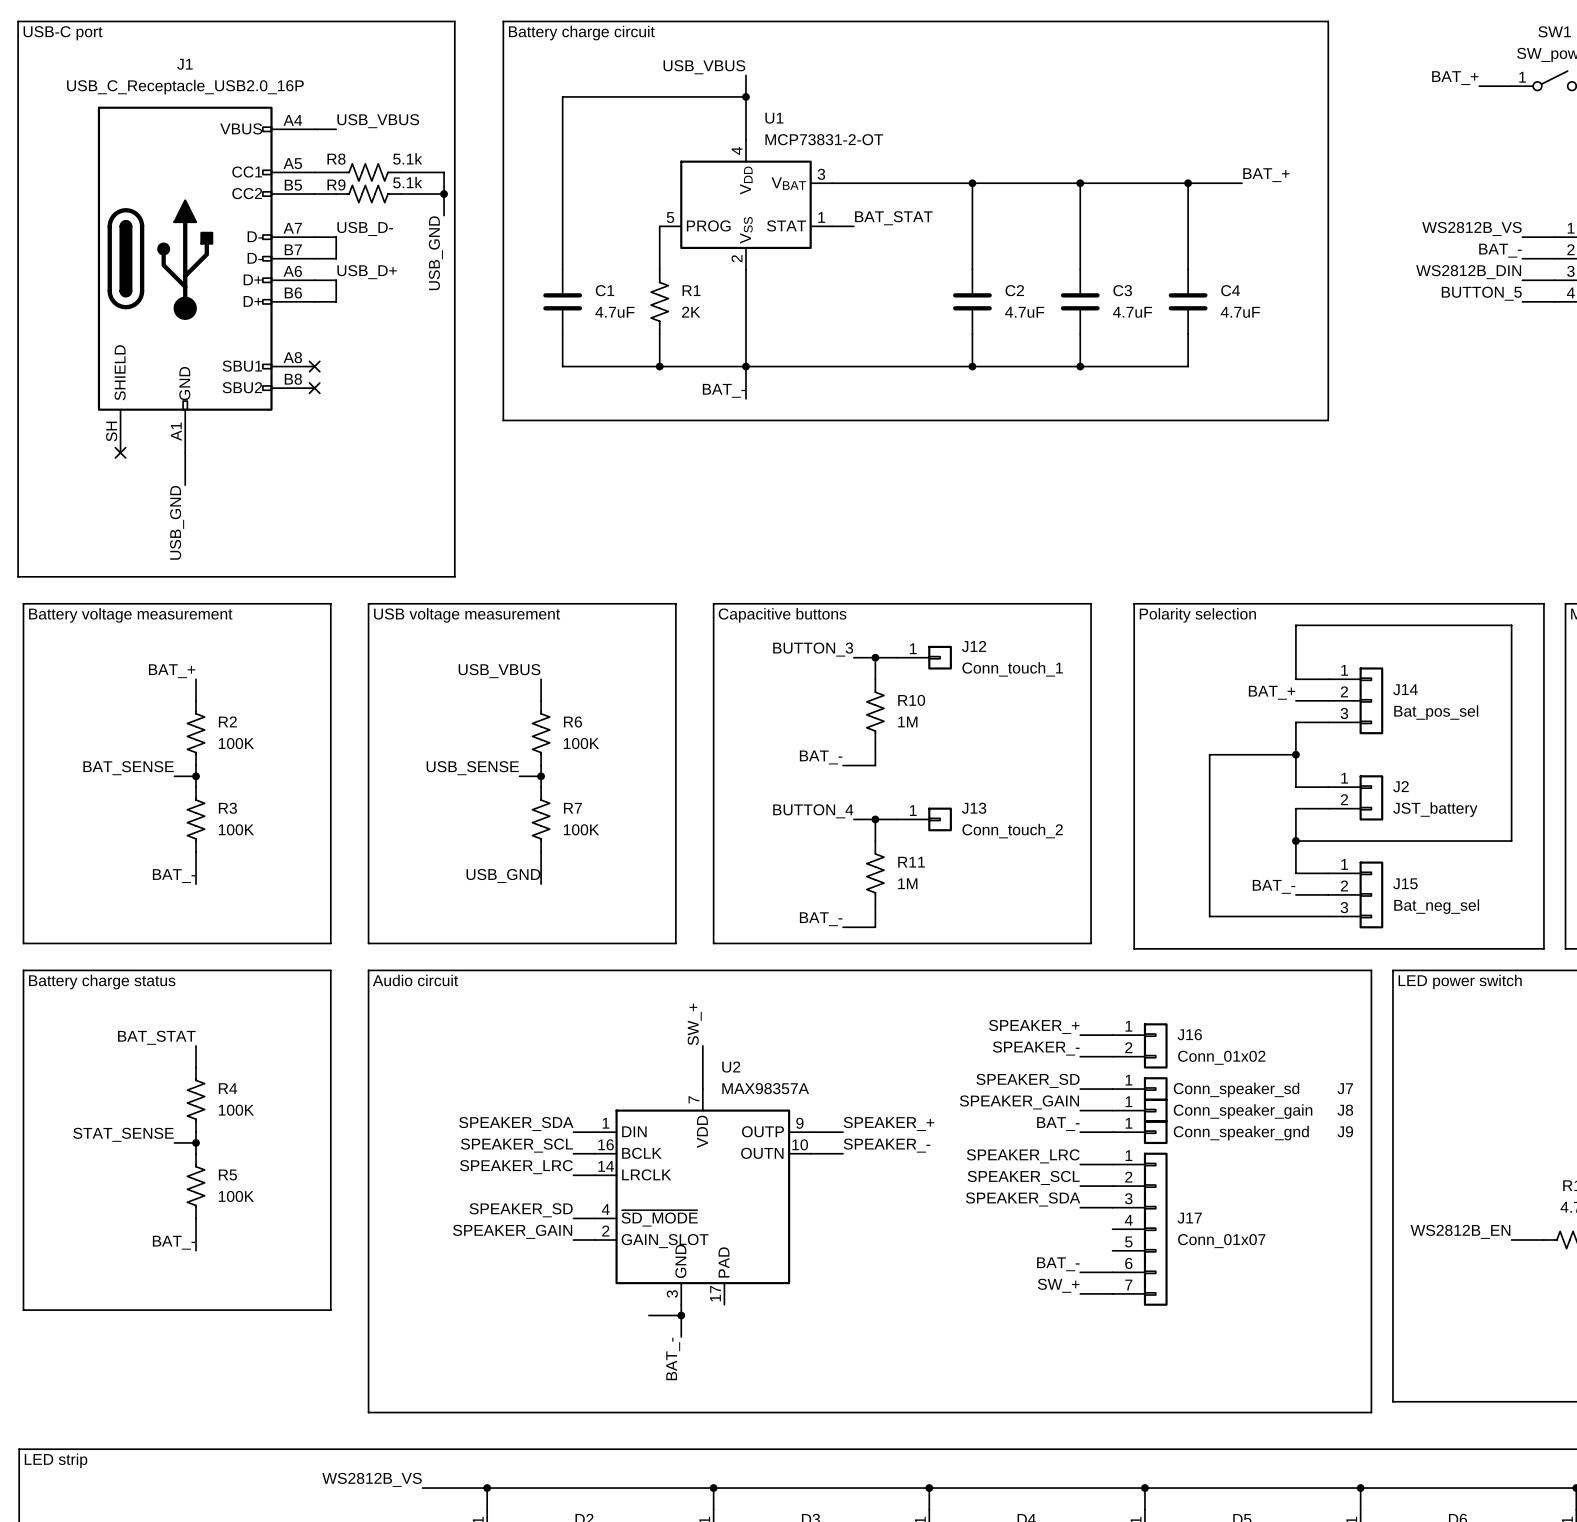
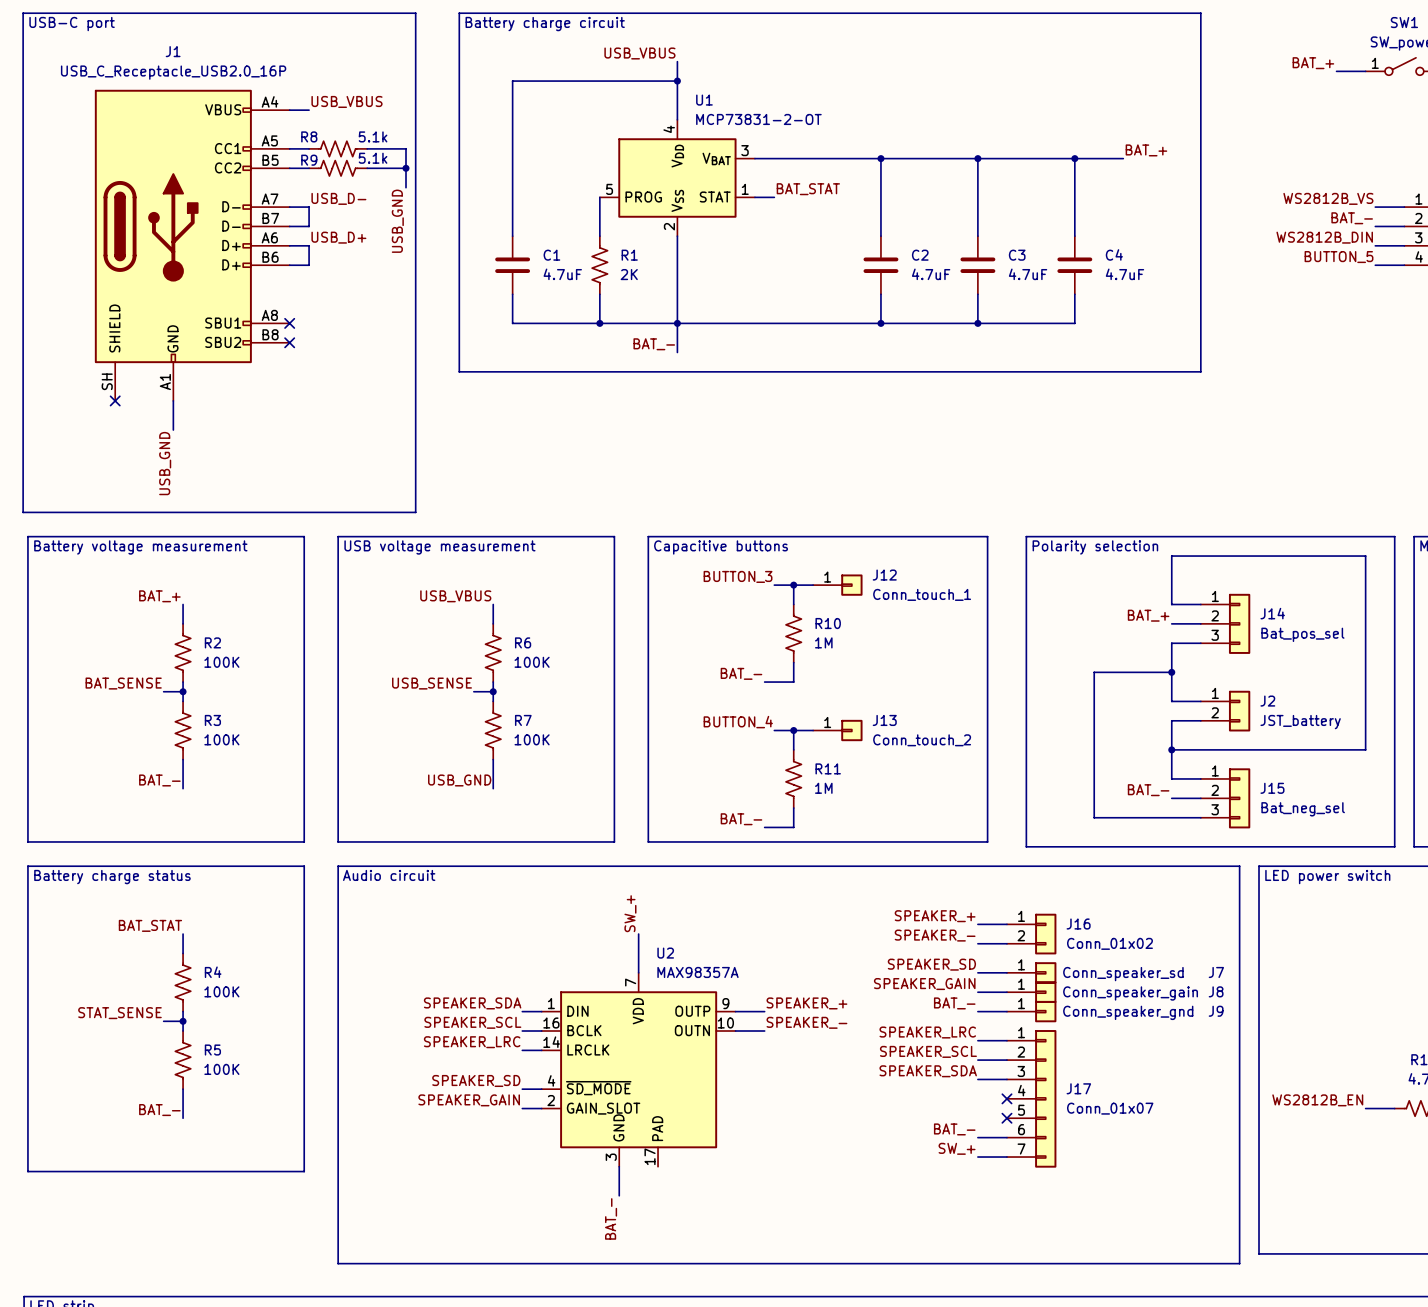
no-connect mark: none -> (1006, 1098)
no-connect mark: none -> (1006, 1118)
wire: (648, 1315) (681, 1315) -> none
junction: (681, 1315) -> none

